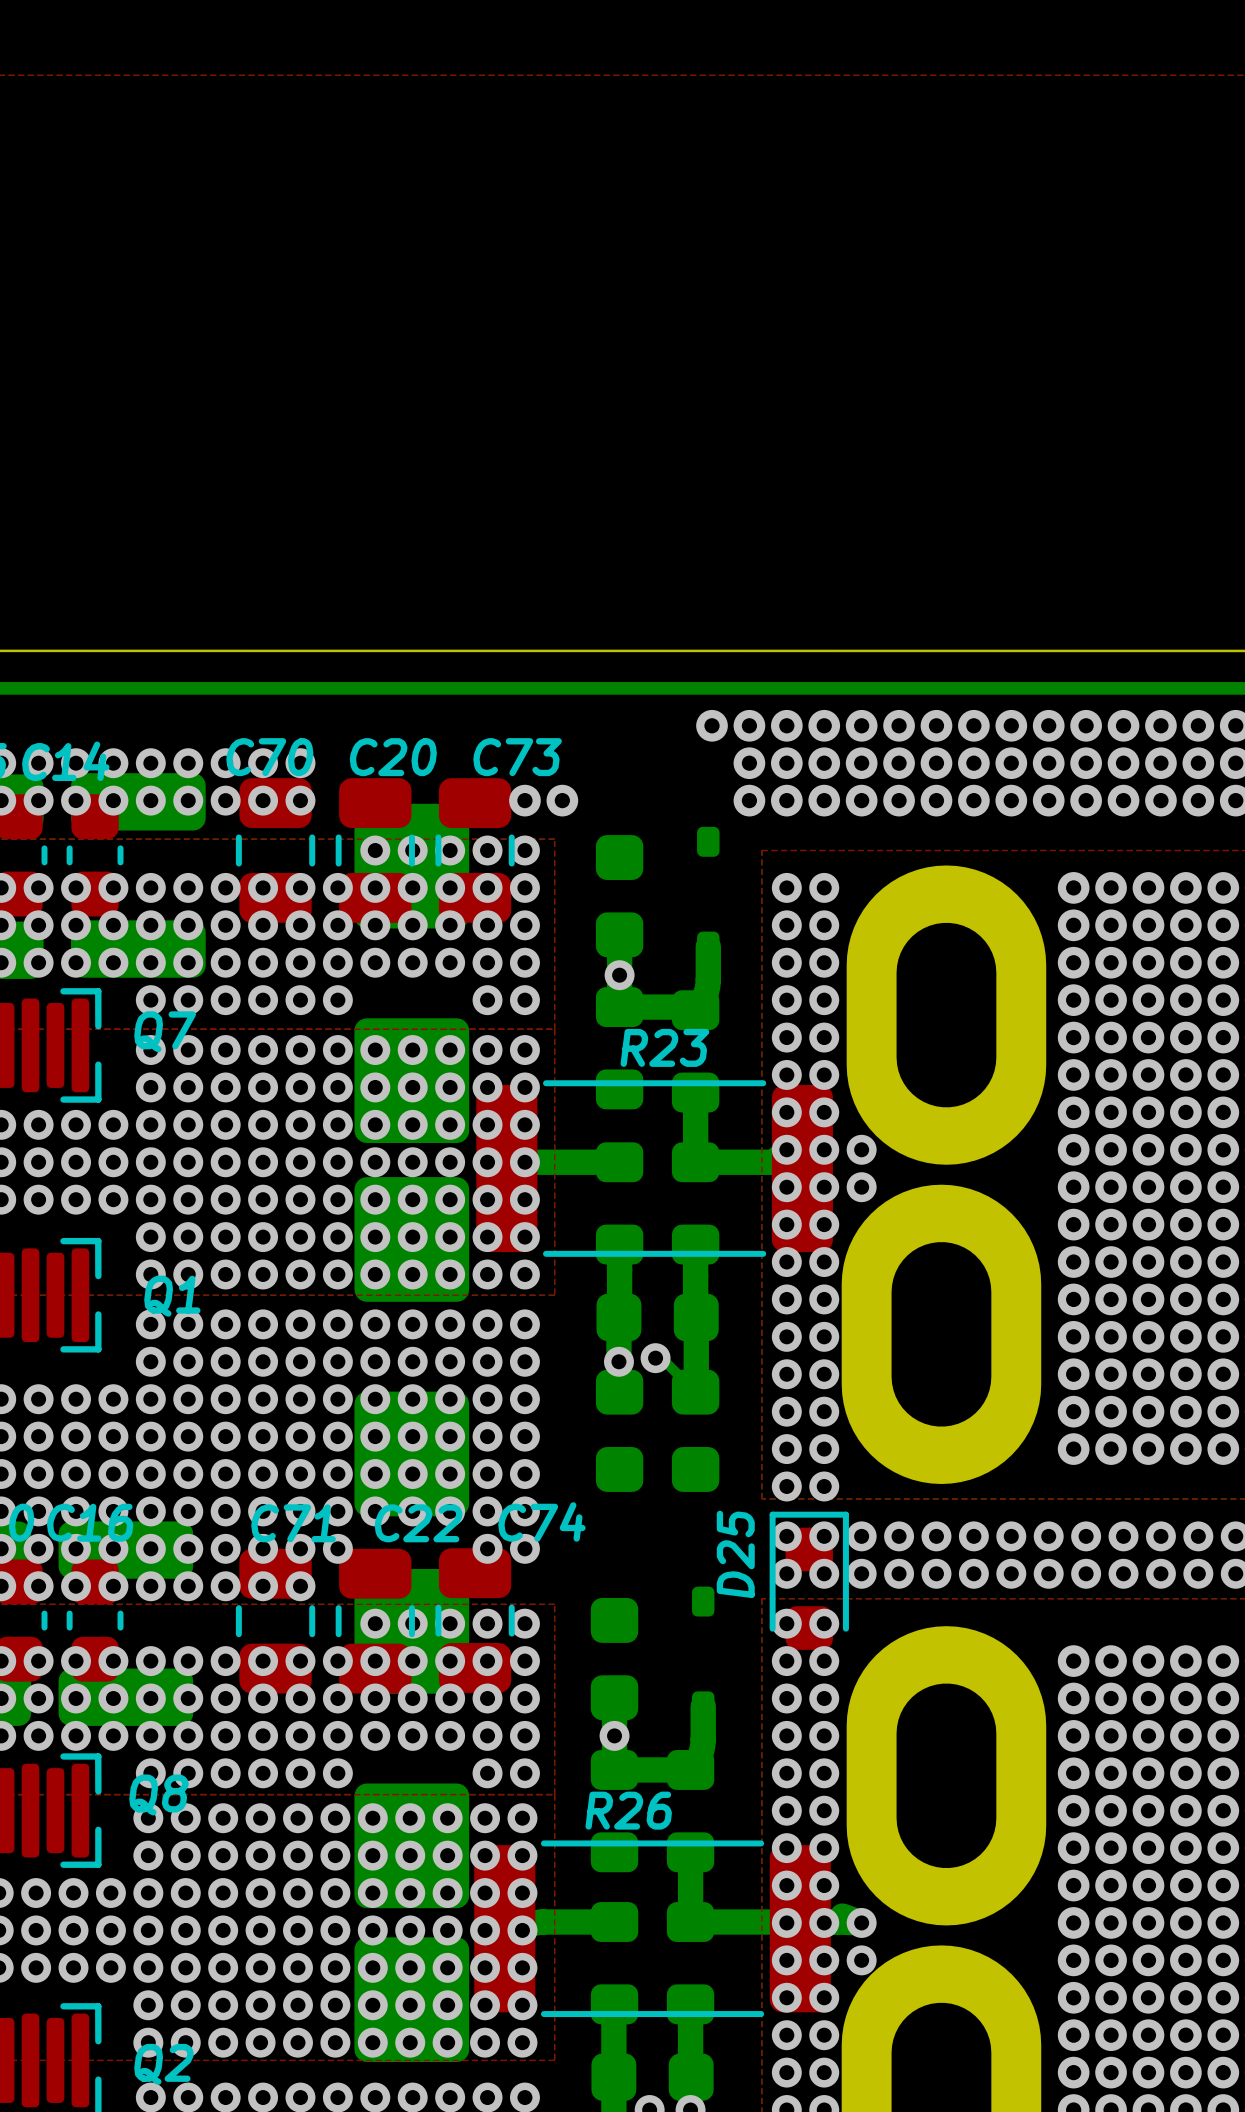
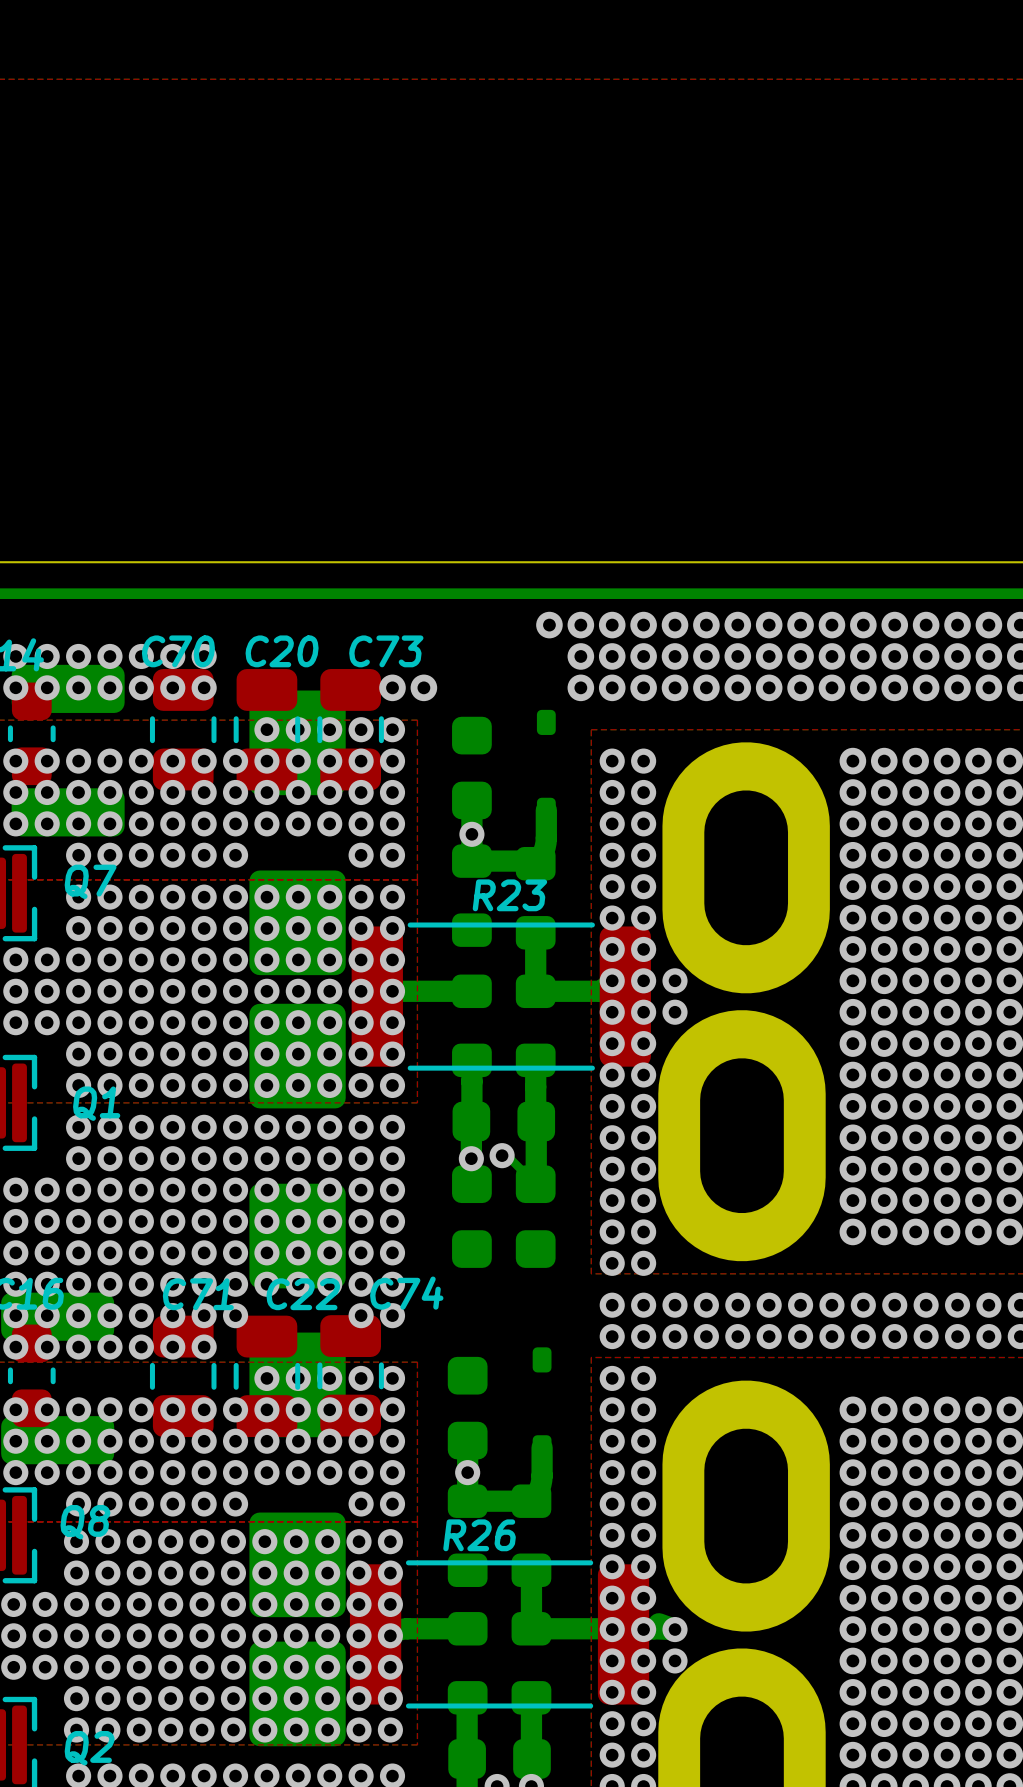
D25: (809, 1580) -> none

